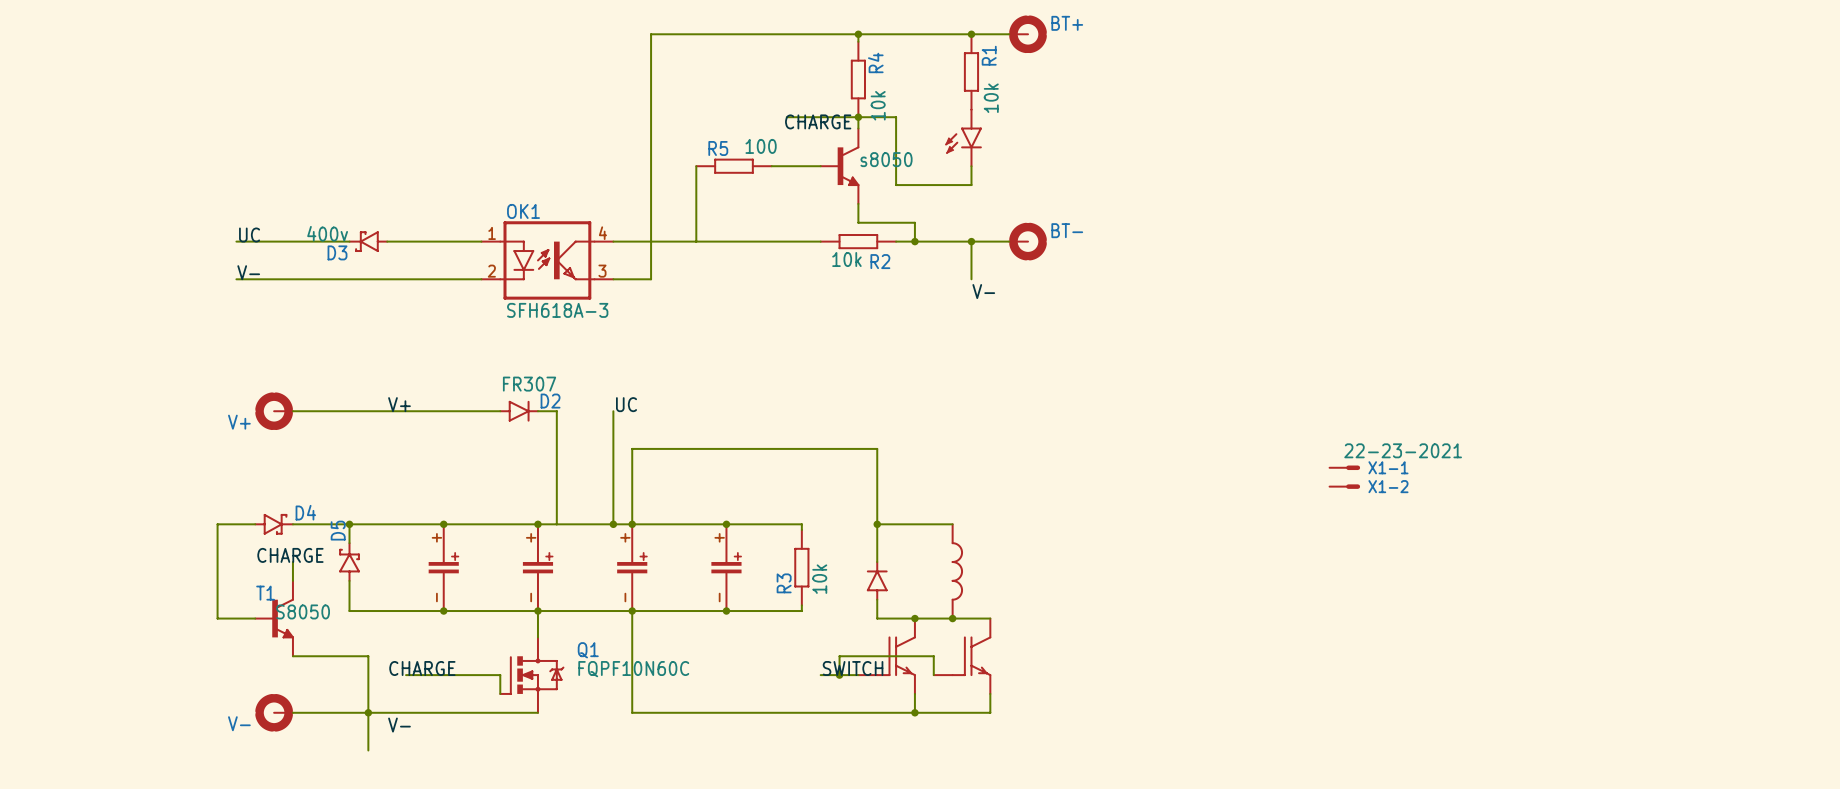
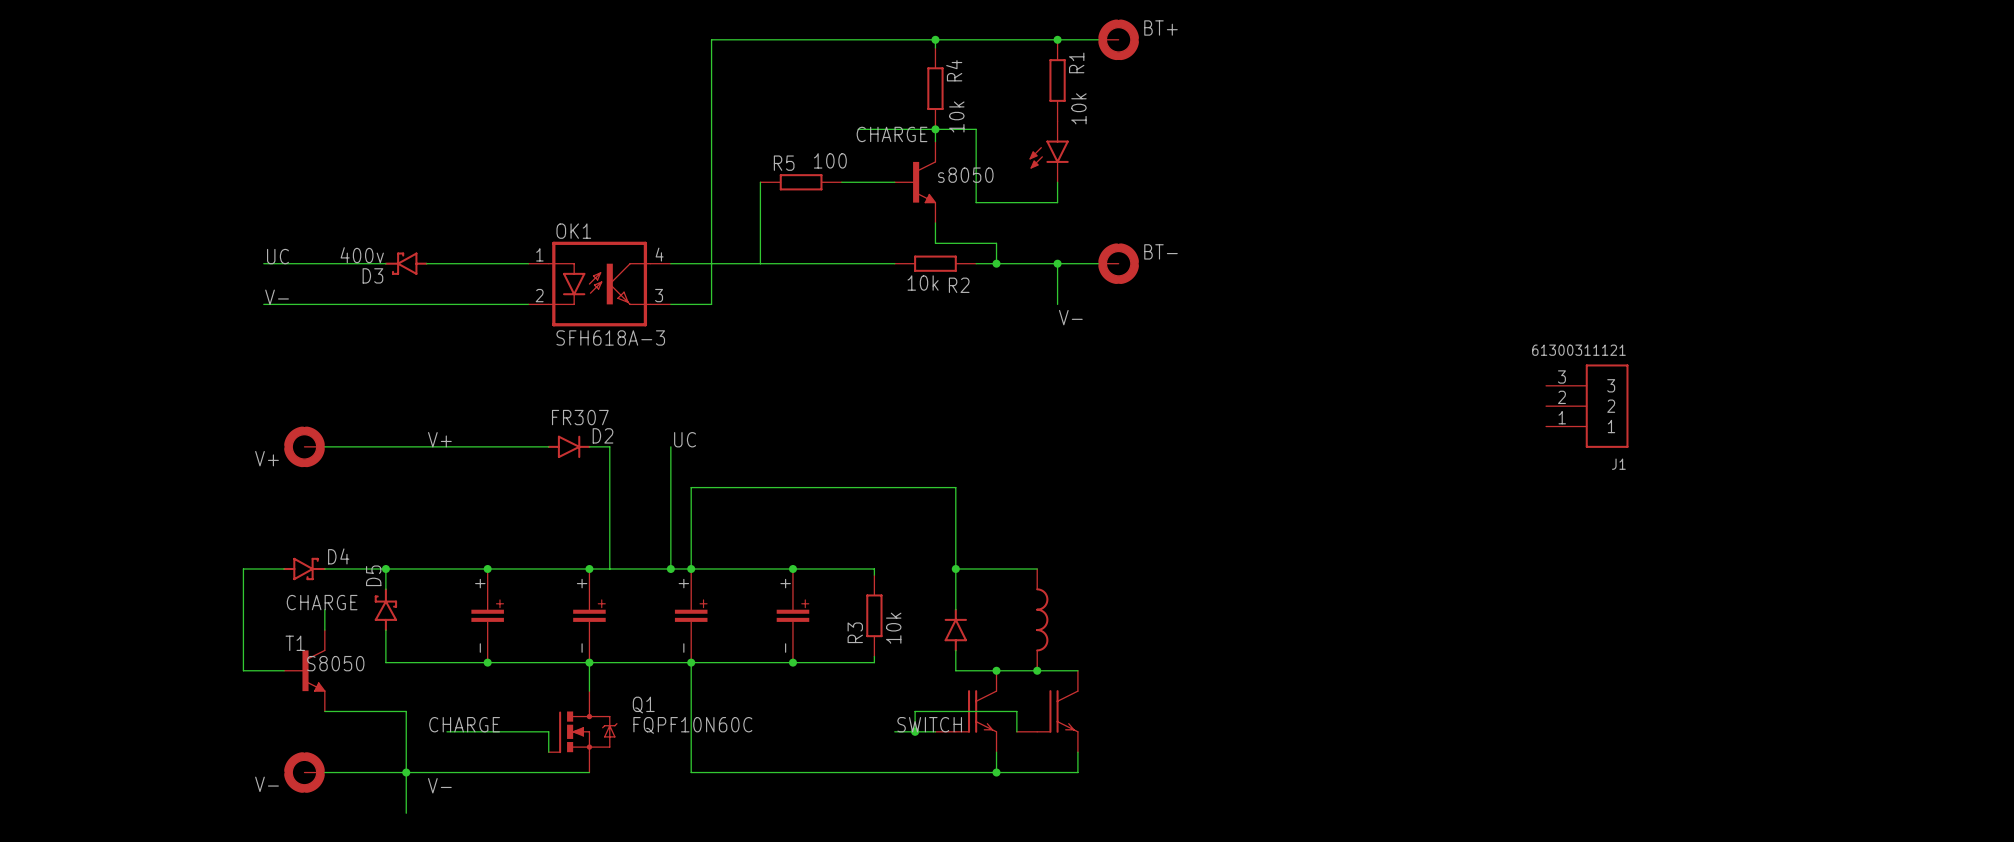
J1: none -> 61300311121 (1587, 406)
X1-1: 22-23-2021 (1344, 467) -> none
X1-2: (1344, 486) -> none

